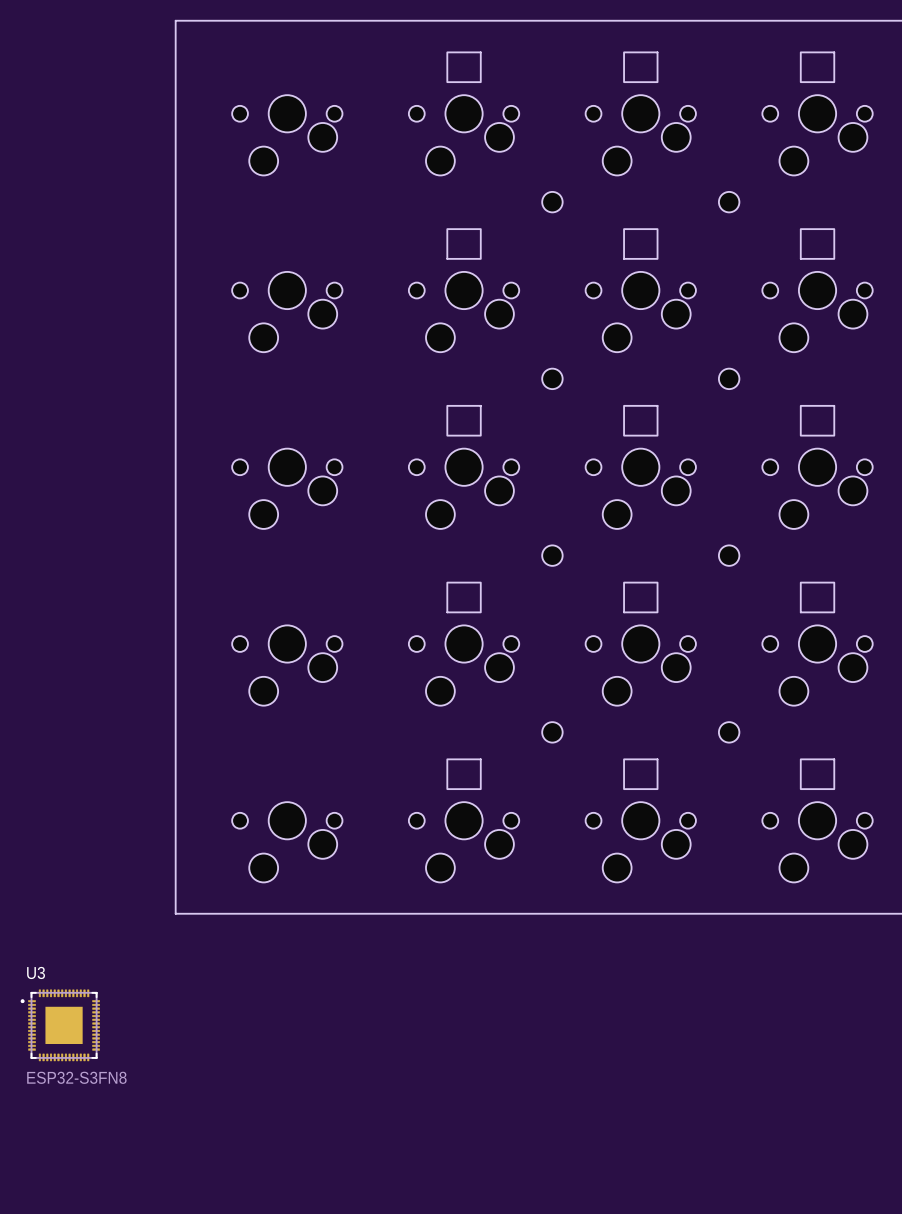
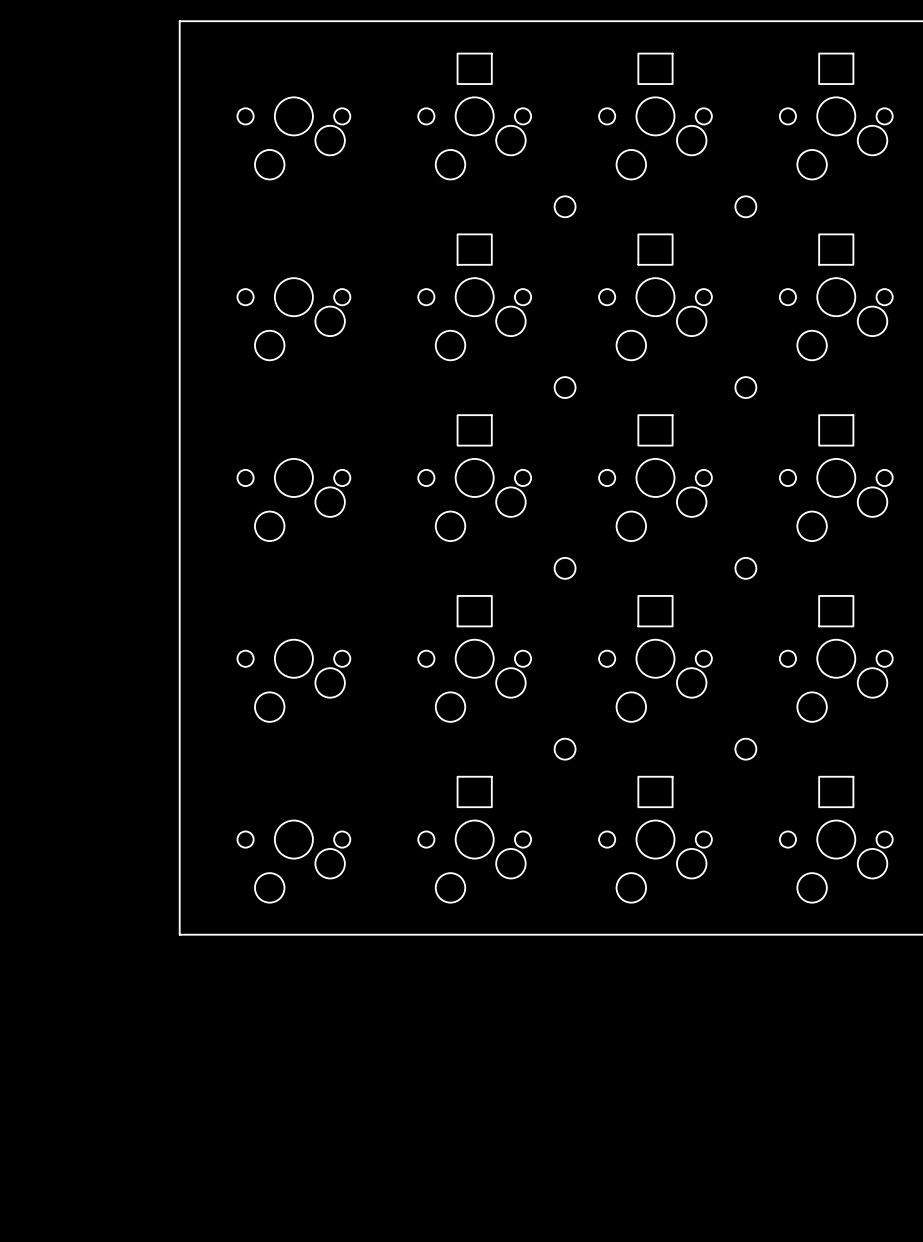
U3: ESP32-S3FN8 (60, 1025) -> none

